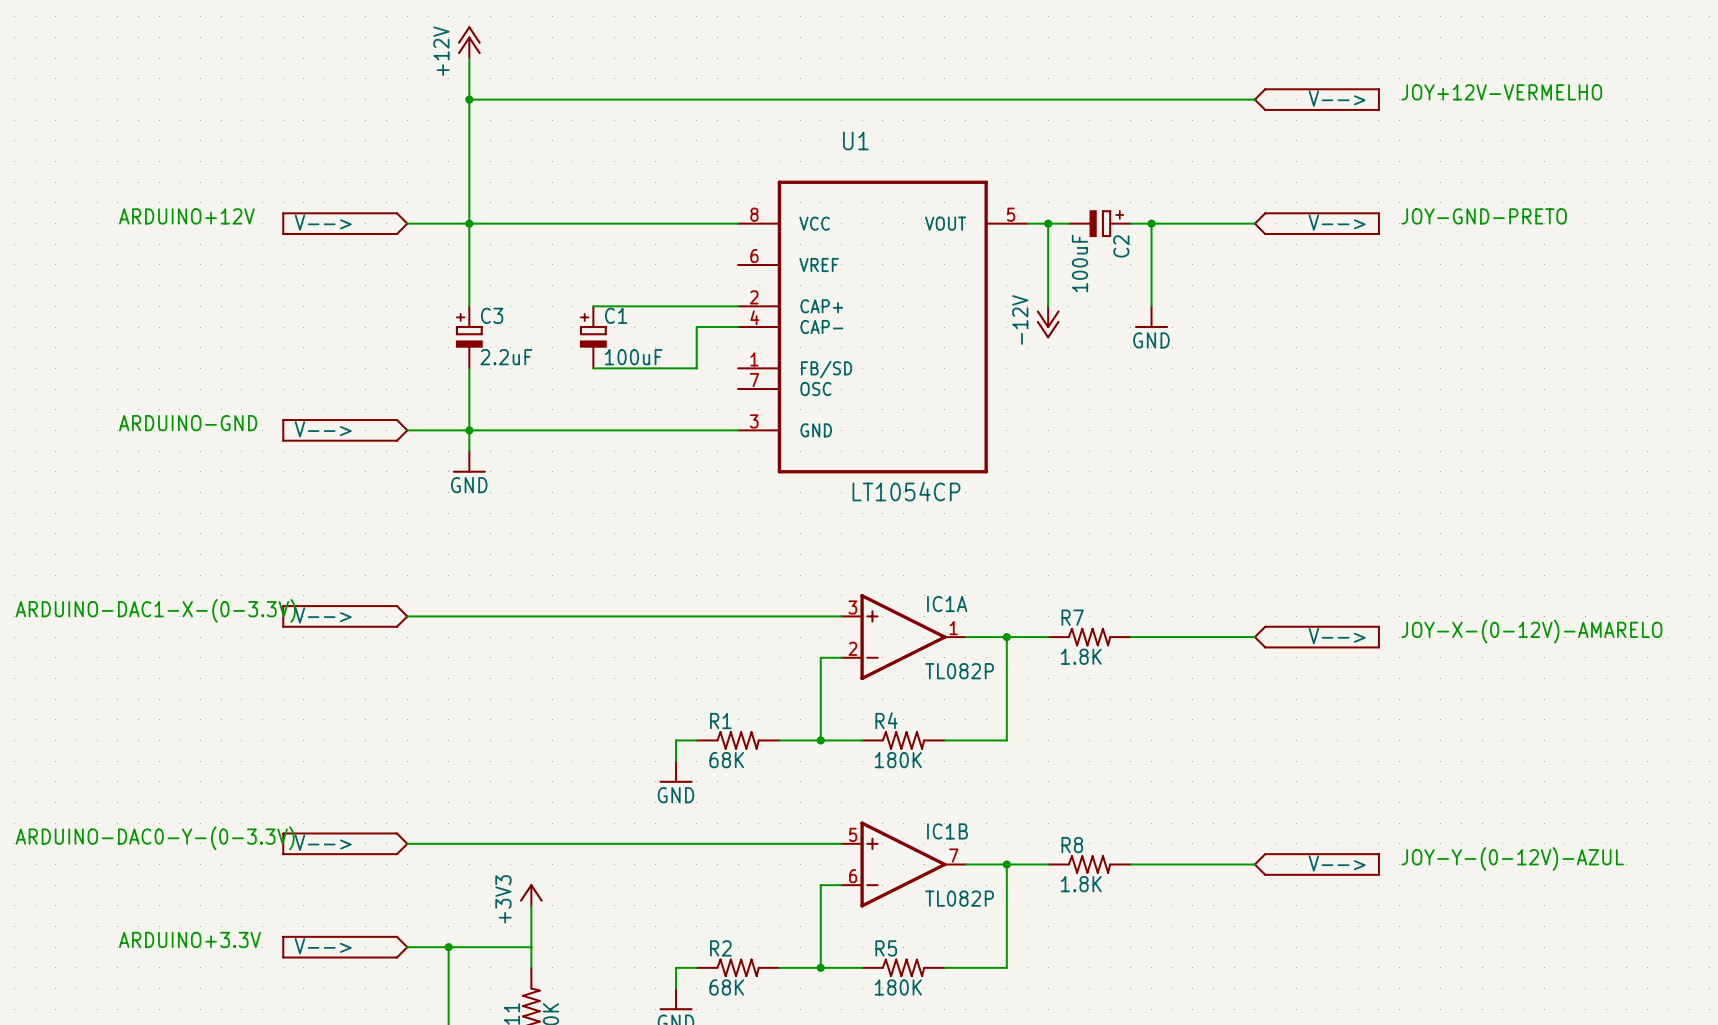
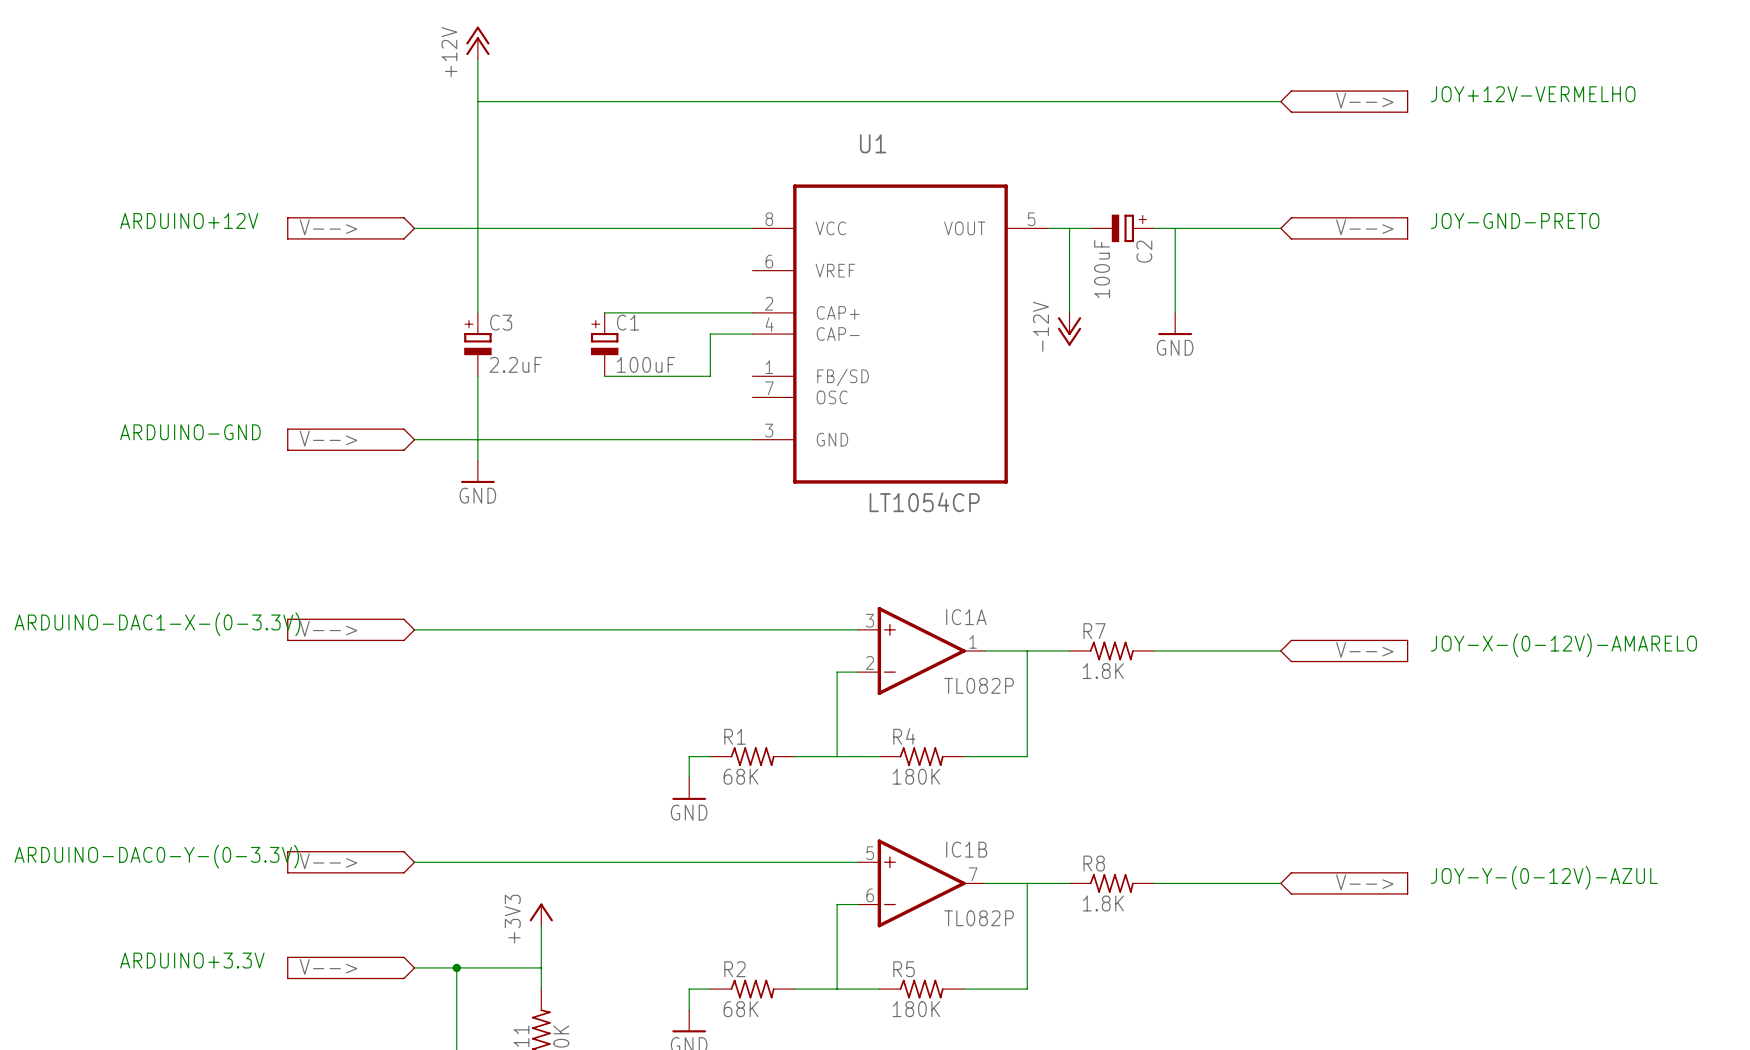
junction: (469, 99) -> none
junction: (469, 223) -> none
junction: (1048, 223) -> none
junction: (1151, 223) -> none
junction: (469, 430) -> none
junction: (1006, 637) -> none
junction: (820, 740) -> none
junction: (1006, 864) -> none
junction: (820, 967) -> none

